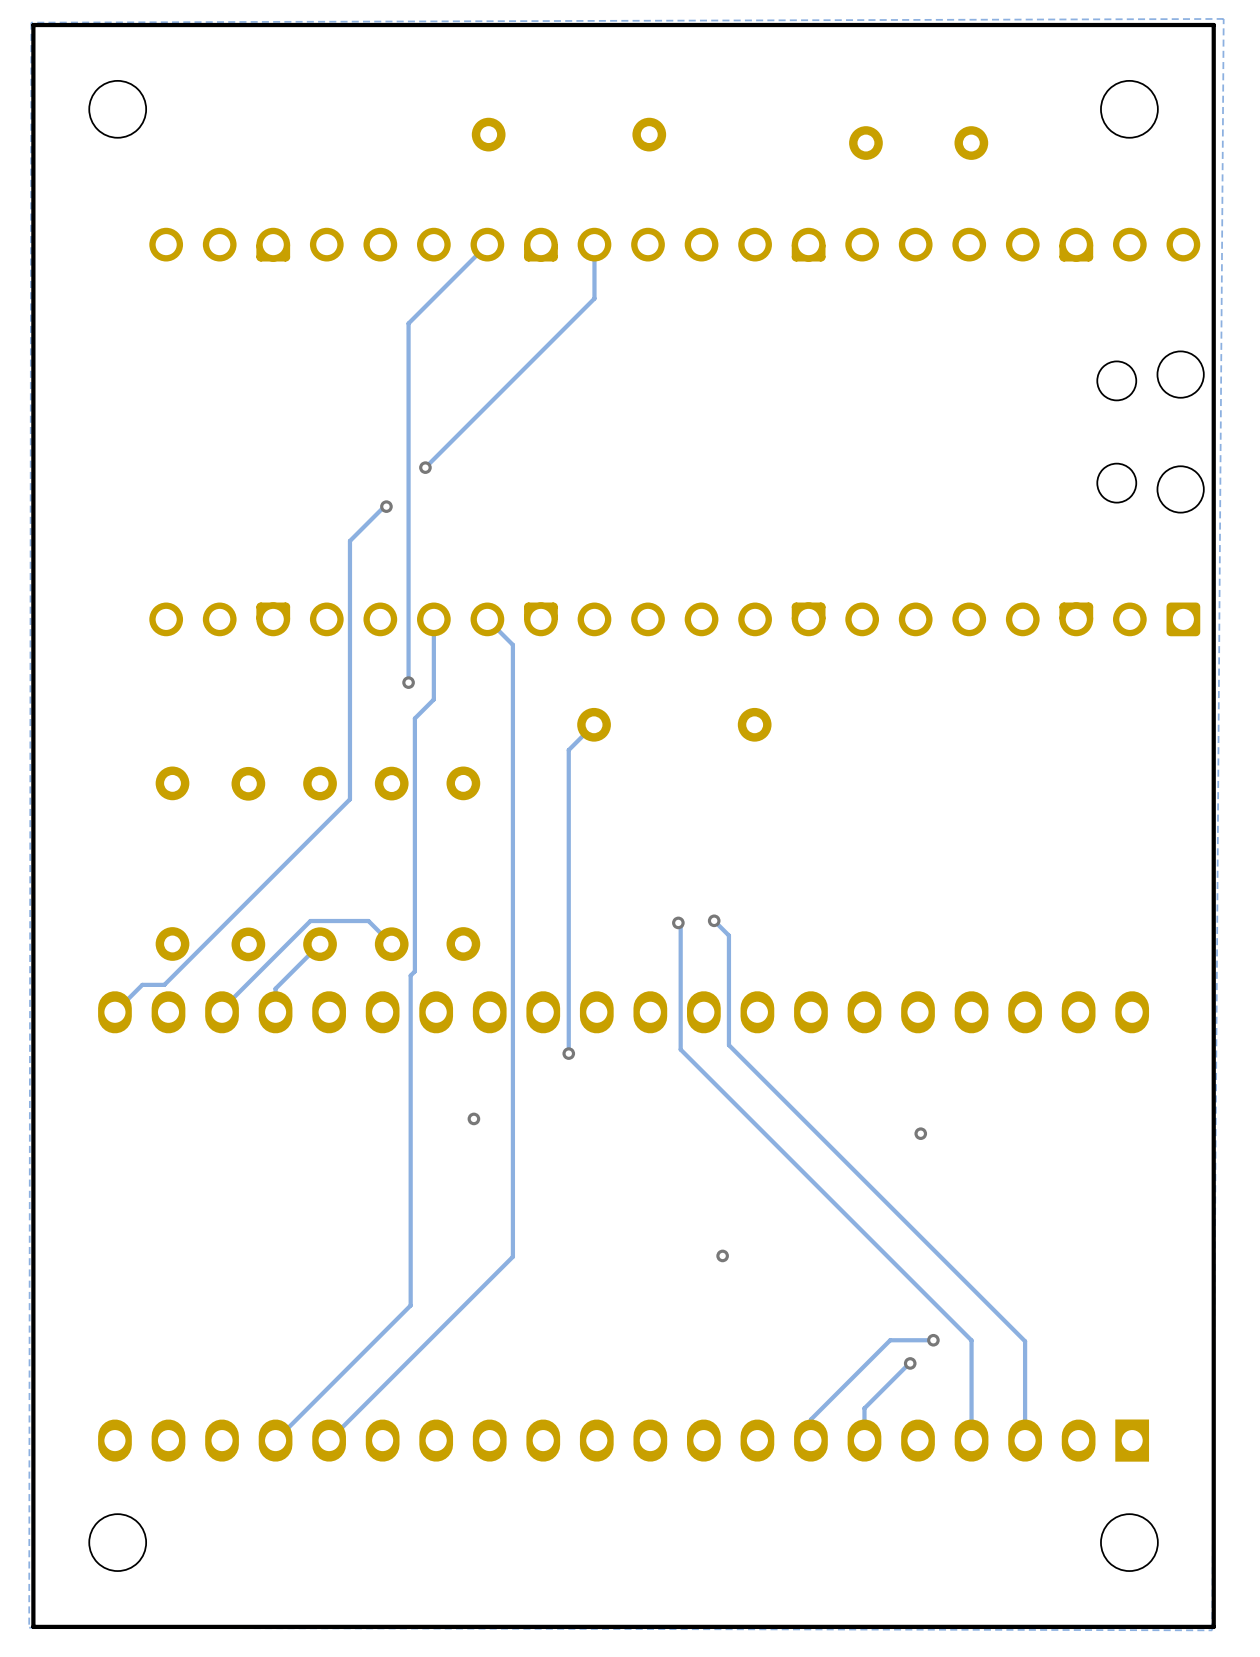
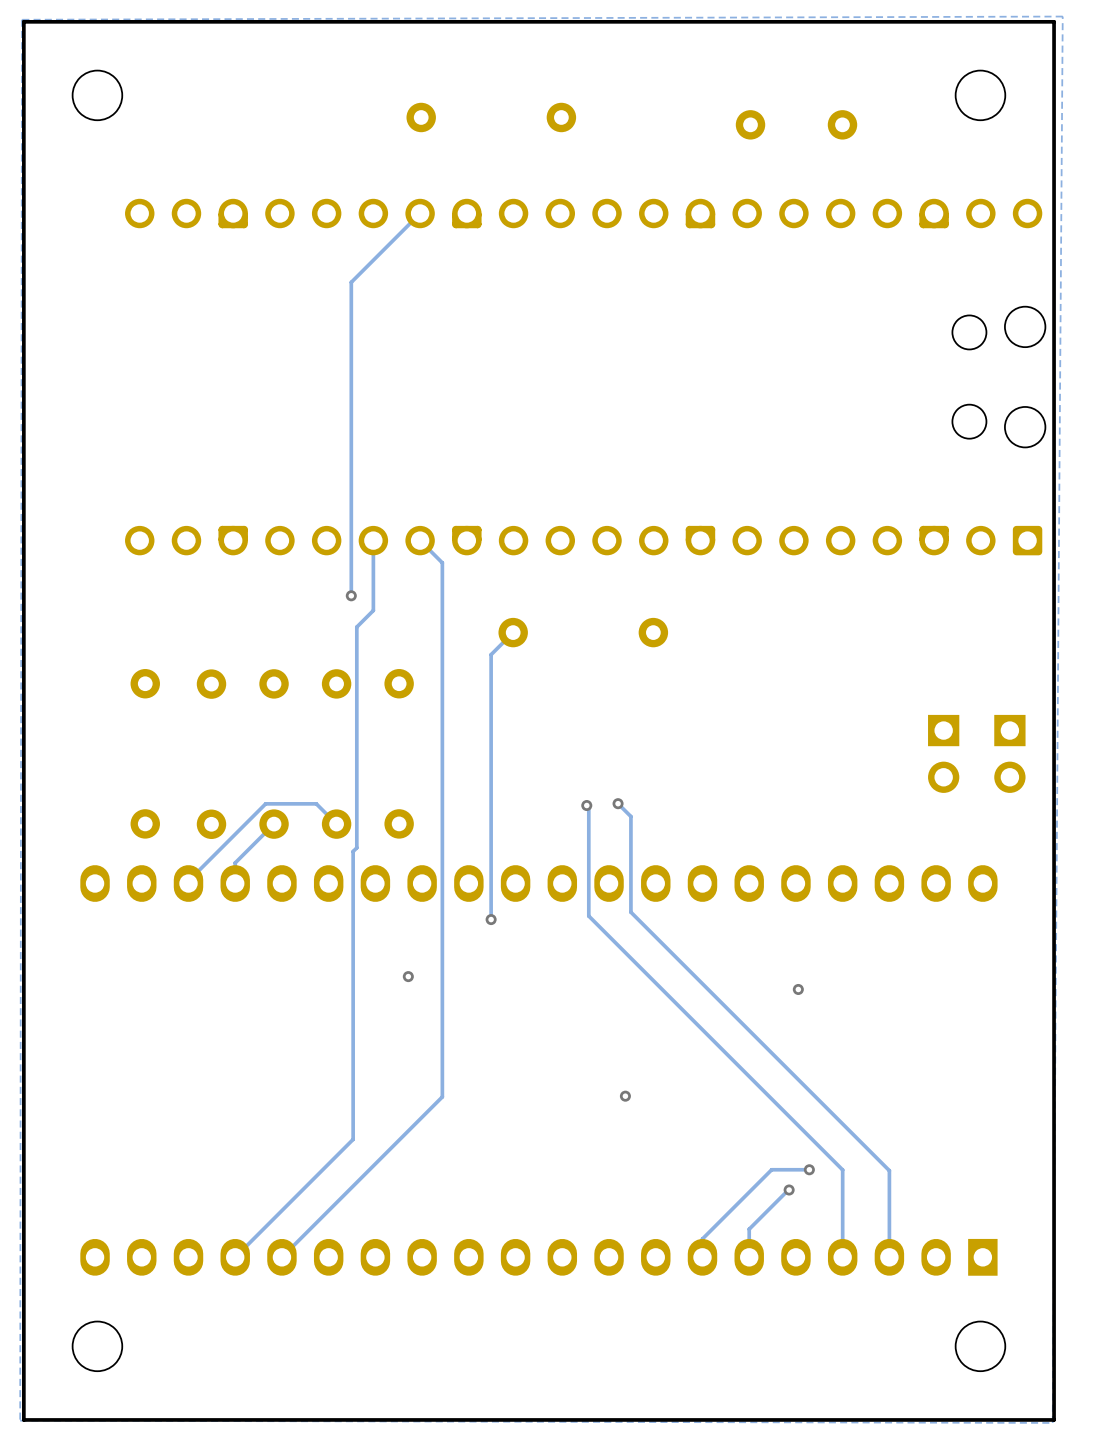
track: (594, 244) (594, 298) (425, 467) -> none
via: (425, 467) -> none
track: (386, 506) (349, 540) (349, 799) (164, 984) (142, 984) (114, 1012) -> none
via: (386, 506) -> none
part: none -> (943, 753)
part: none -> (1009, 753)

